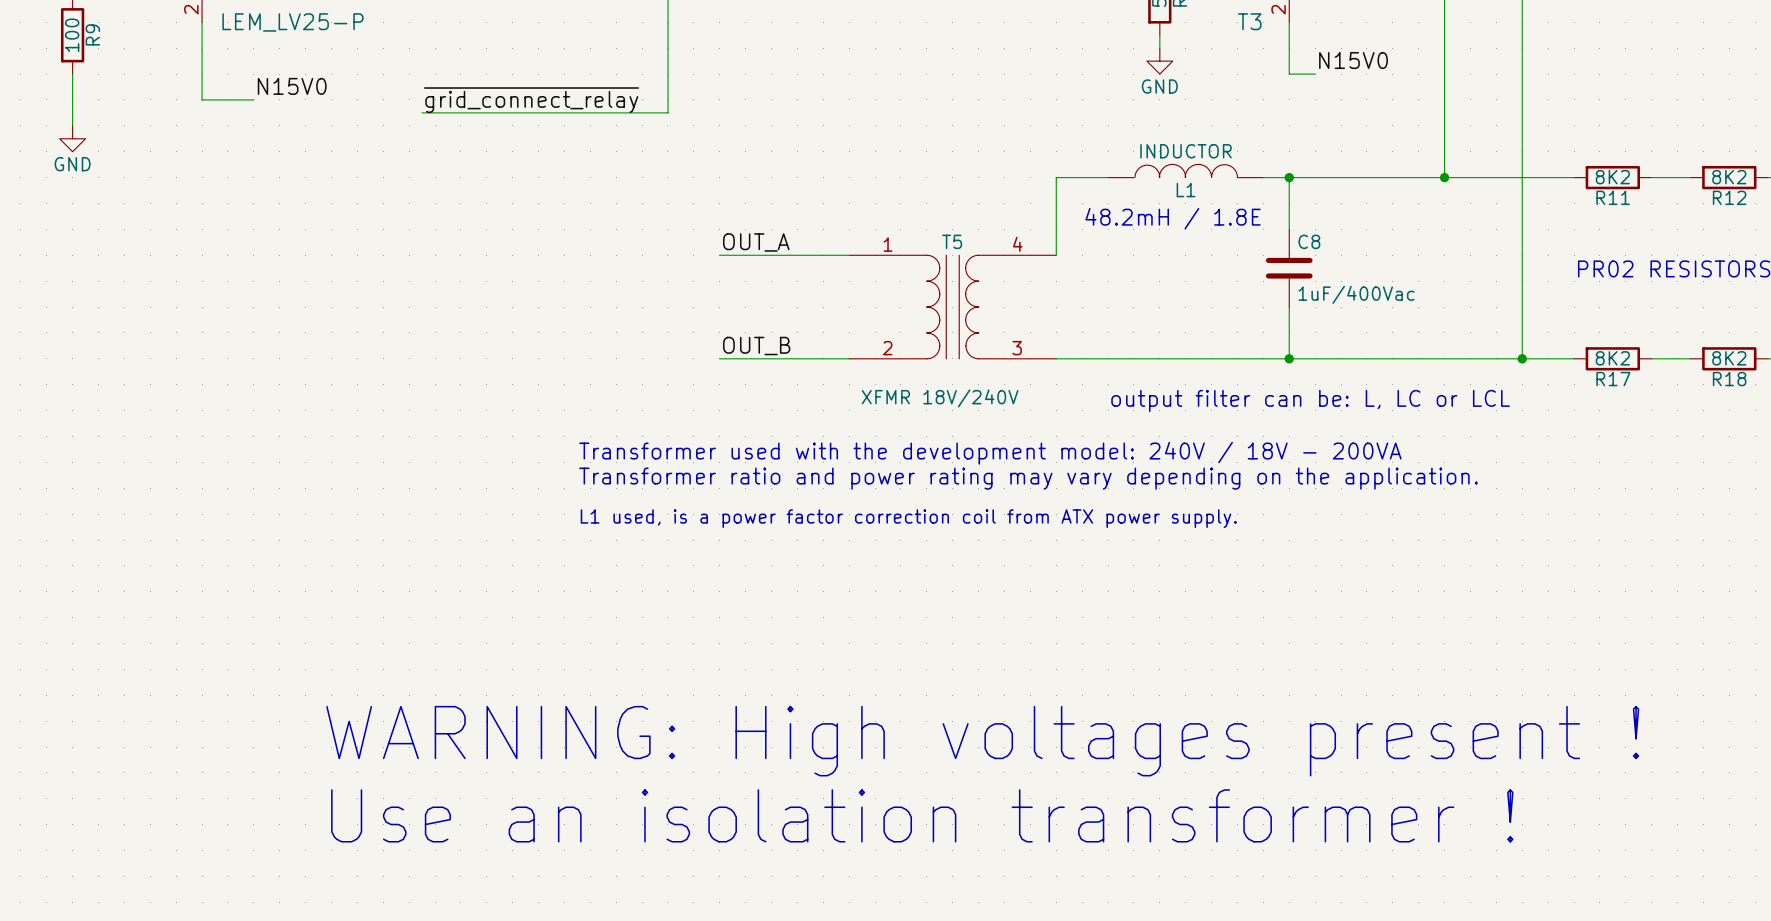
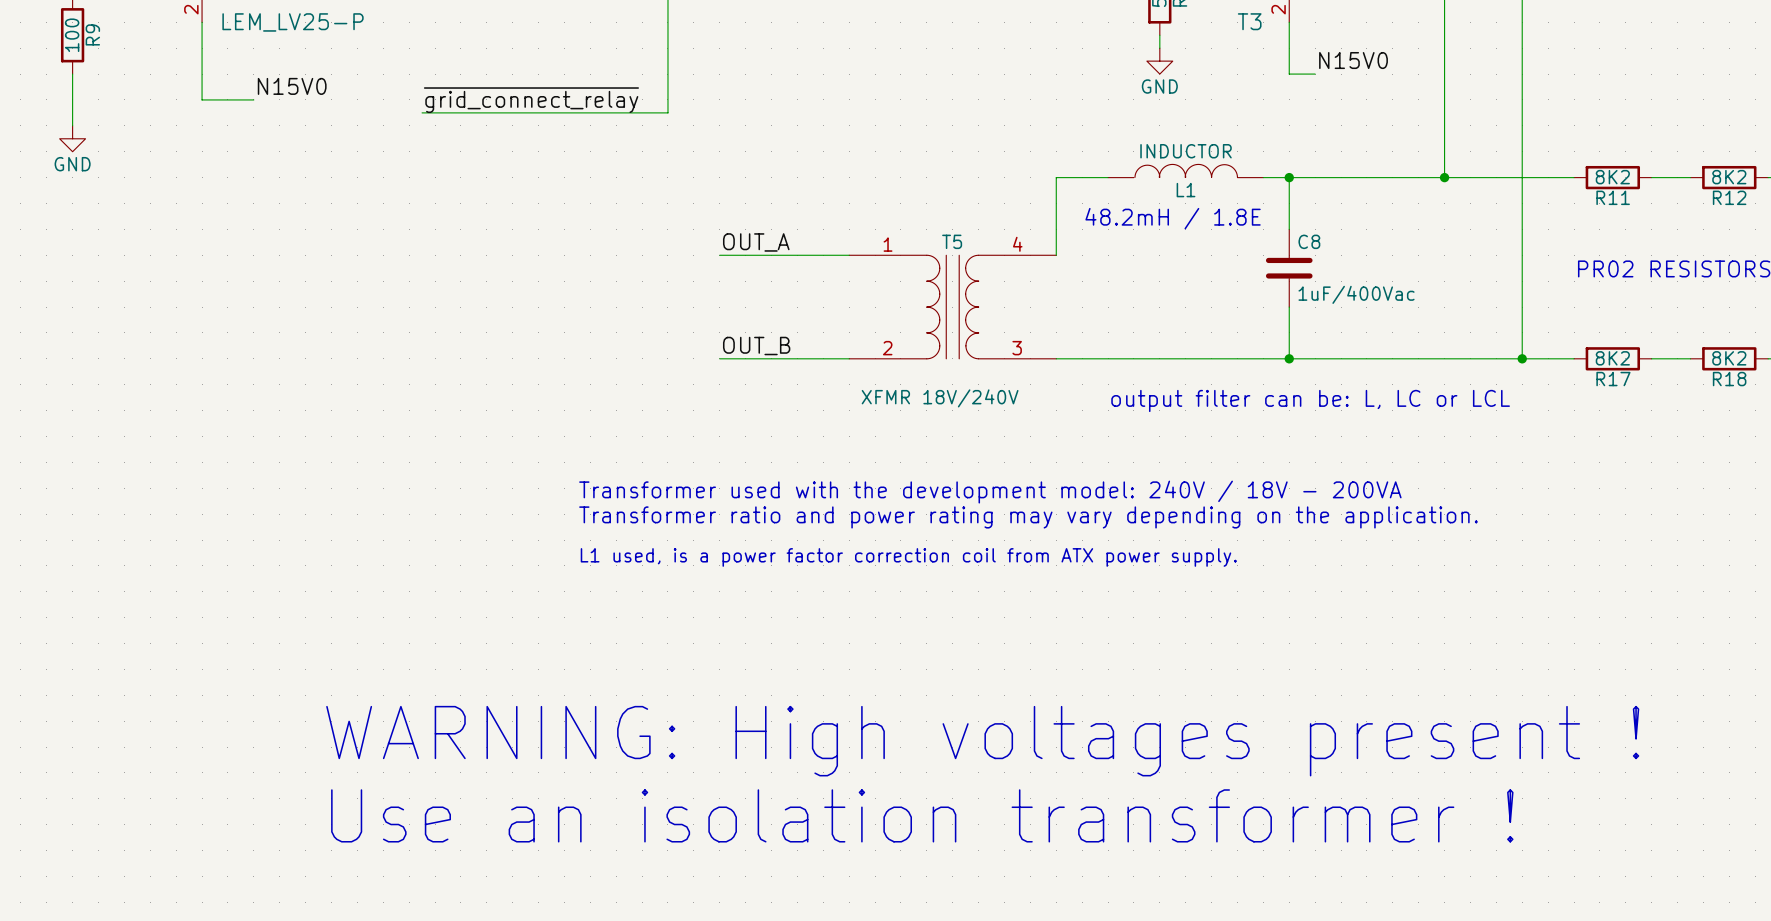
text position: Transformer used with the development model: 240V / 18V - 200VA (990, 453) -> Transformer used with the development model: 240V / 18V - 200VA (990, 492)
text: Transformer ratio and power rating may vary depending on the application. (1028, 478) -> none
text: L1 used, is a power factor correction coil from ATX power supply. (908, 518) -> Transformer ratio and power rating may vary depending on the application. (1028, 517)
text: none -> L1 used, is a power factor correction coil from ATX power supply. (908, 557)

